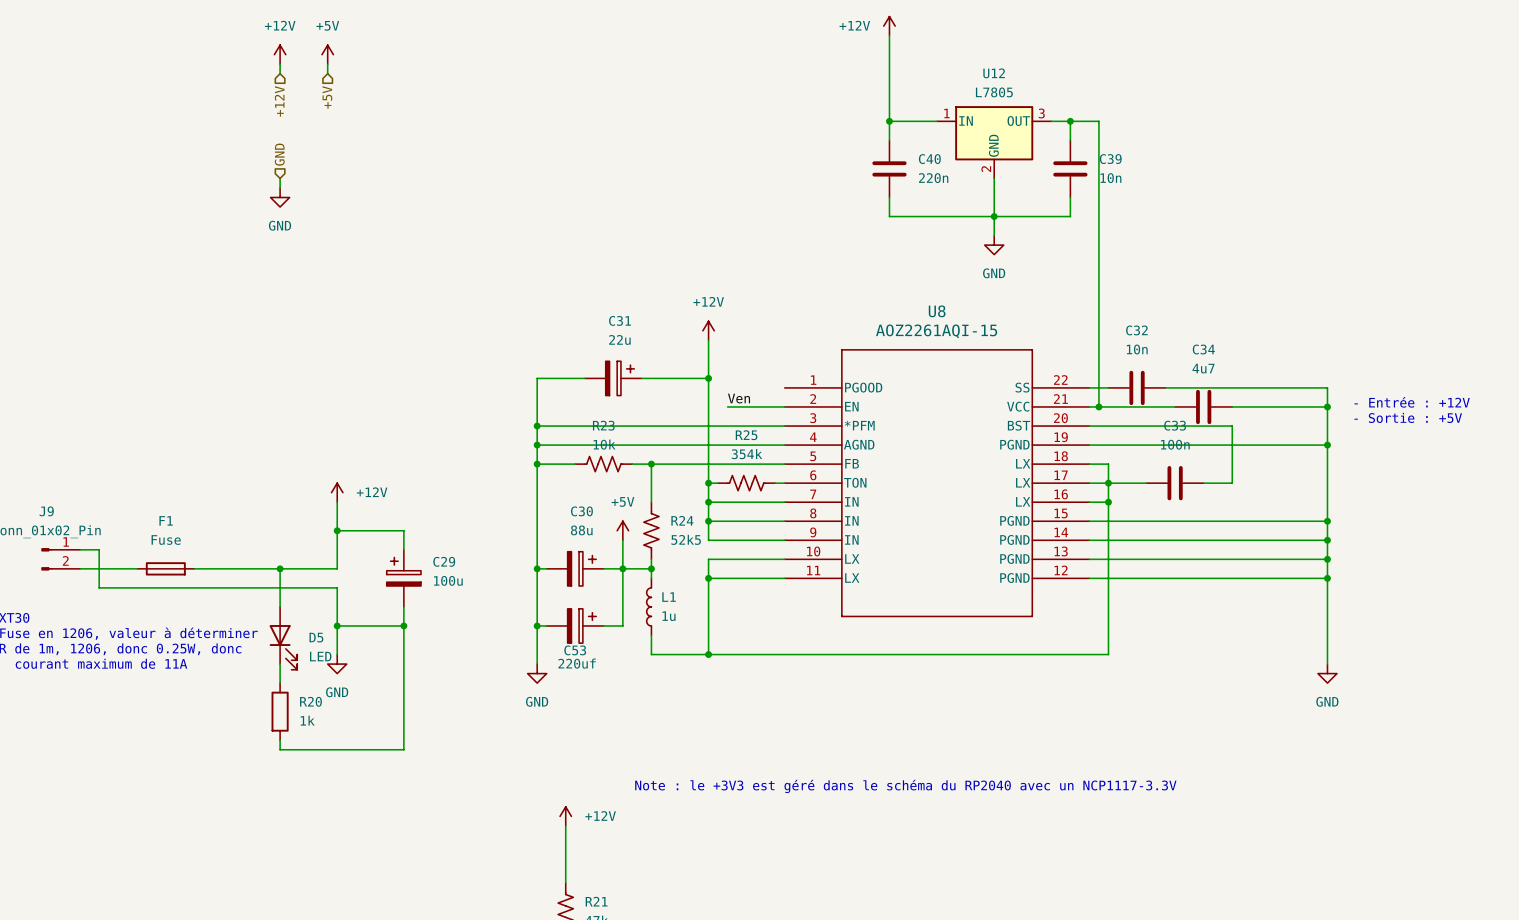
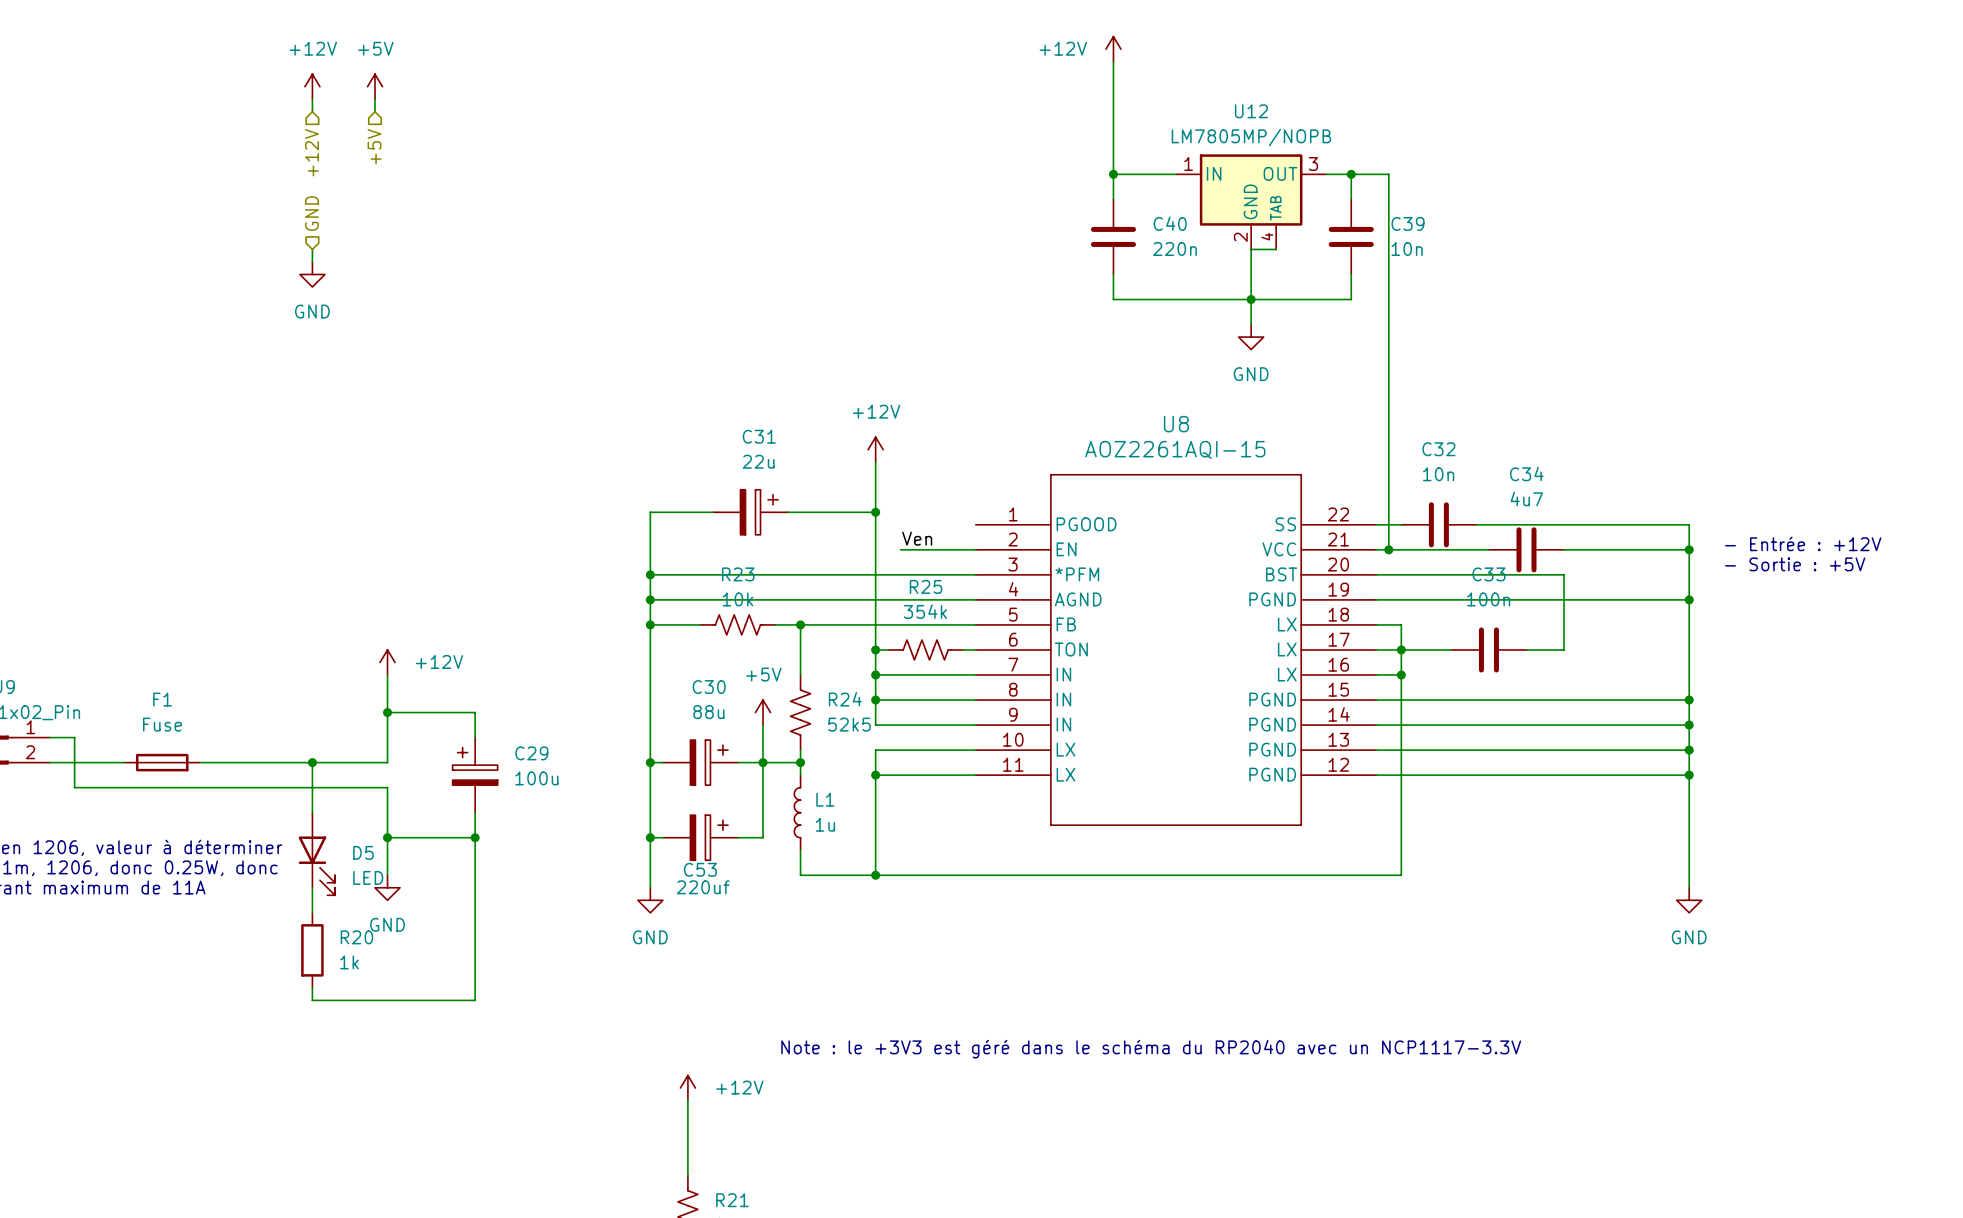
U12 value: L7805 (994, 92) -> LM7805MP/NOPB (1251, 137)
U12 symbol: [937, 106, 1052, 179] -> [1176, 154, 1327, 250]
wire: none -> (1251, 249) (1276, 249)

